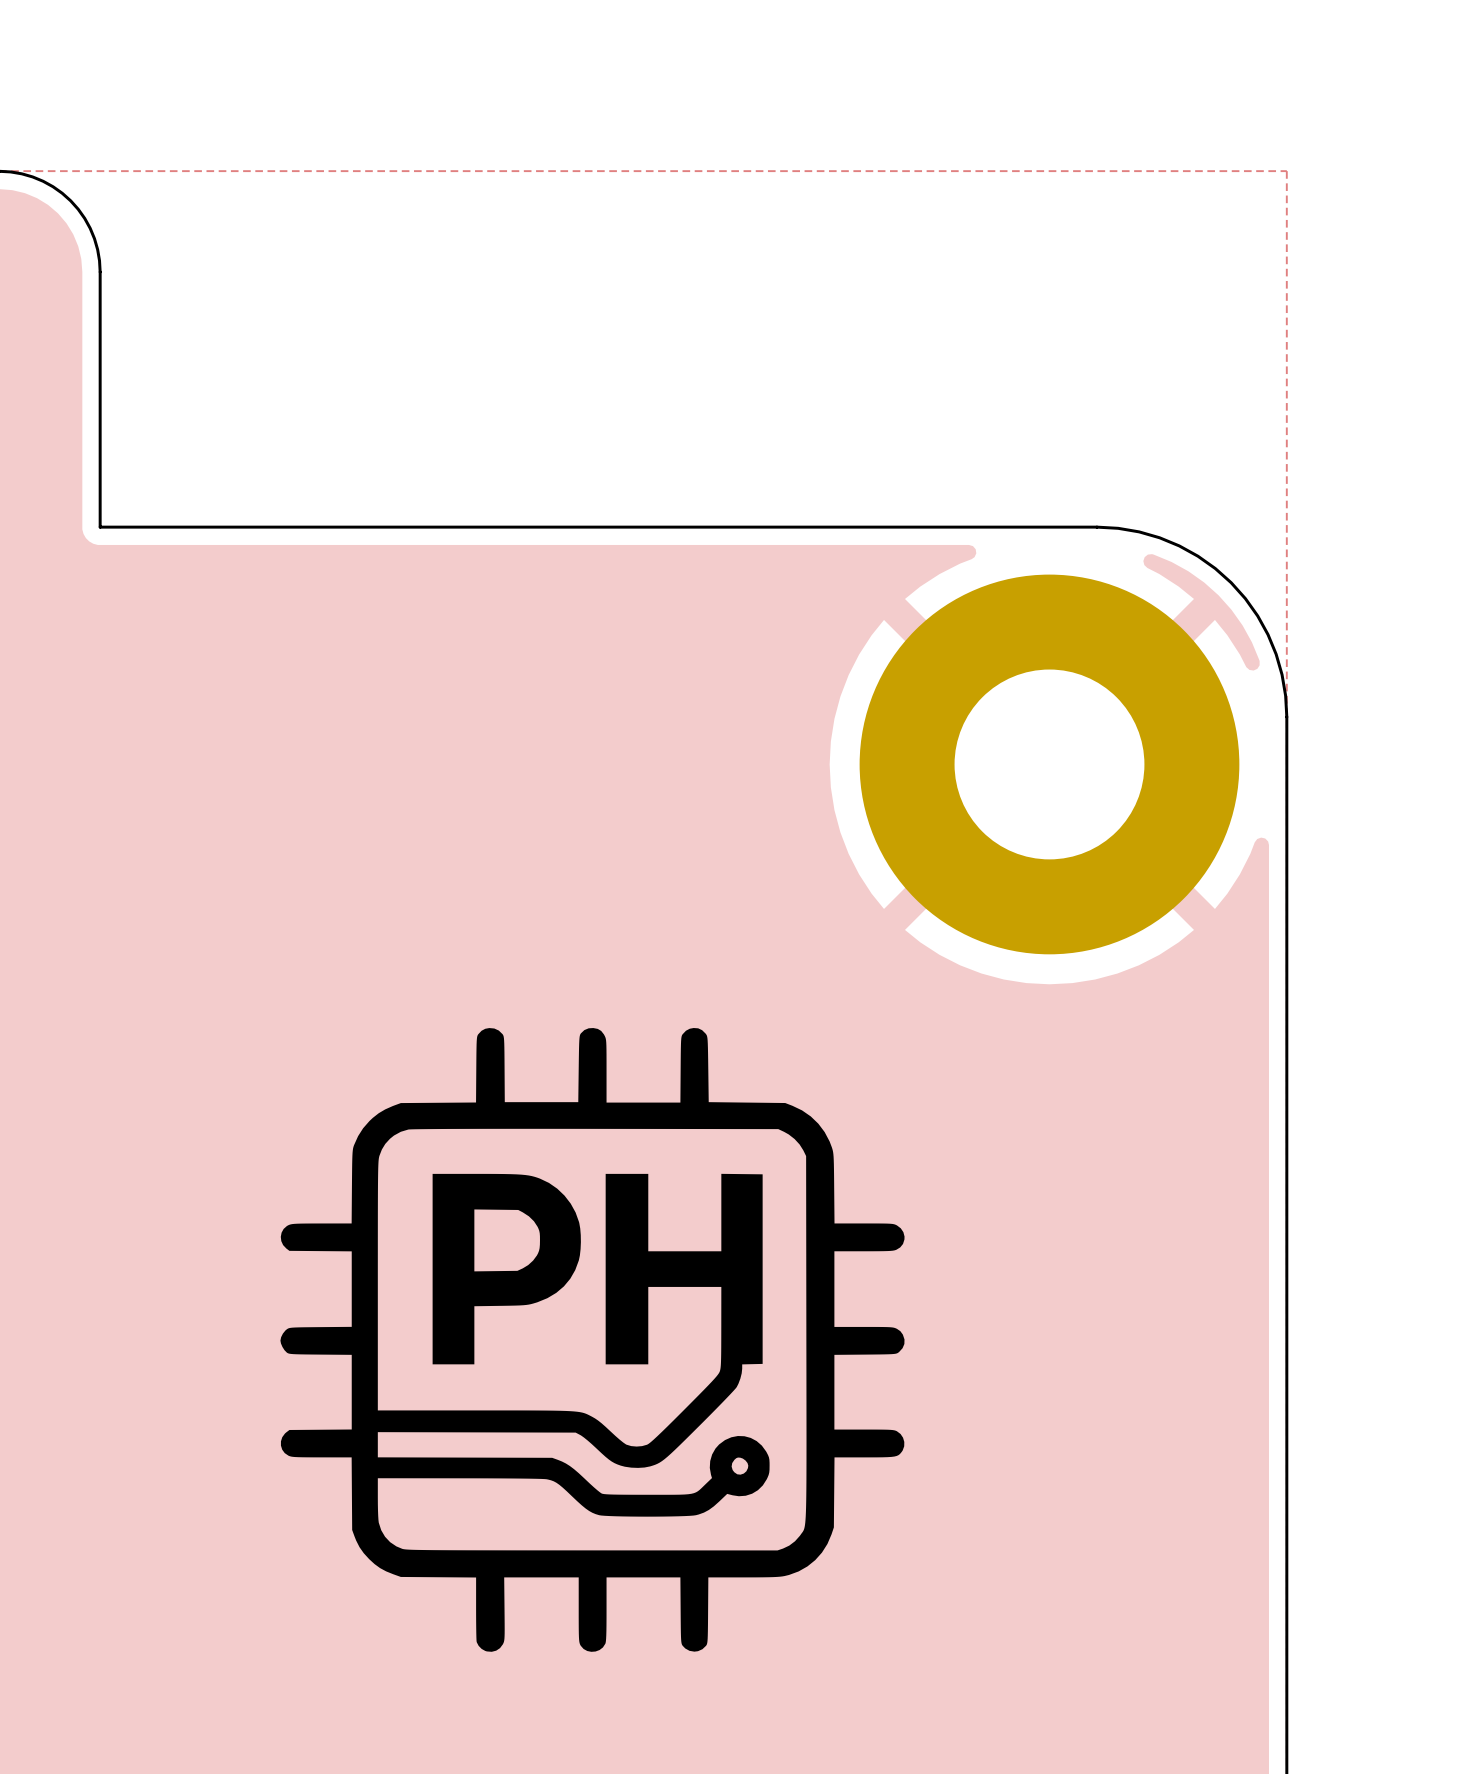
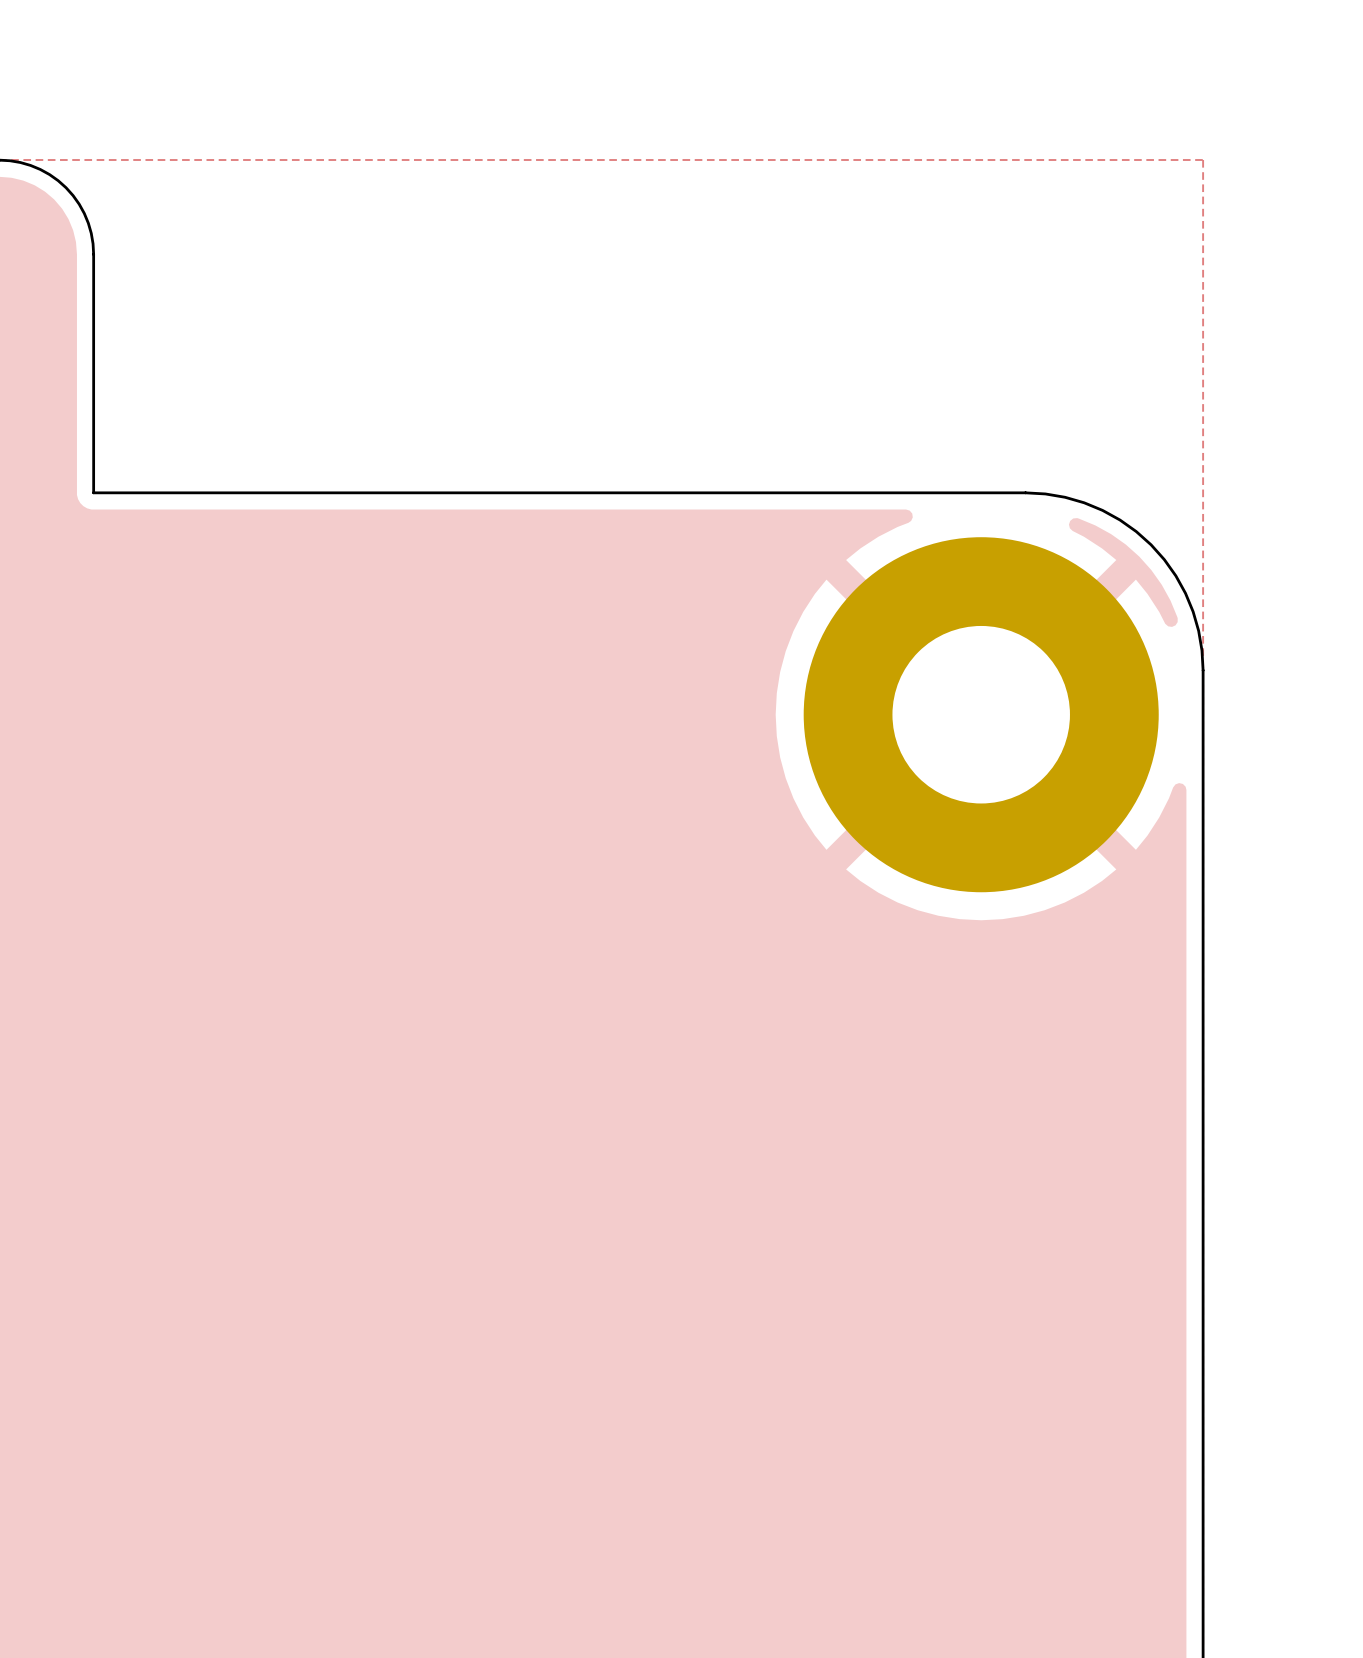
drawing: [280, 1028, 905, 1652] -> none

